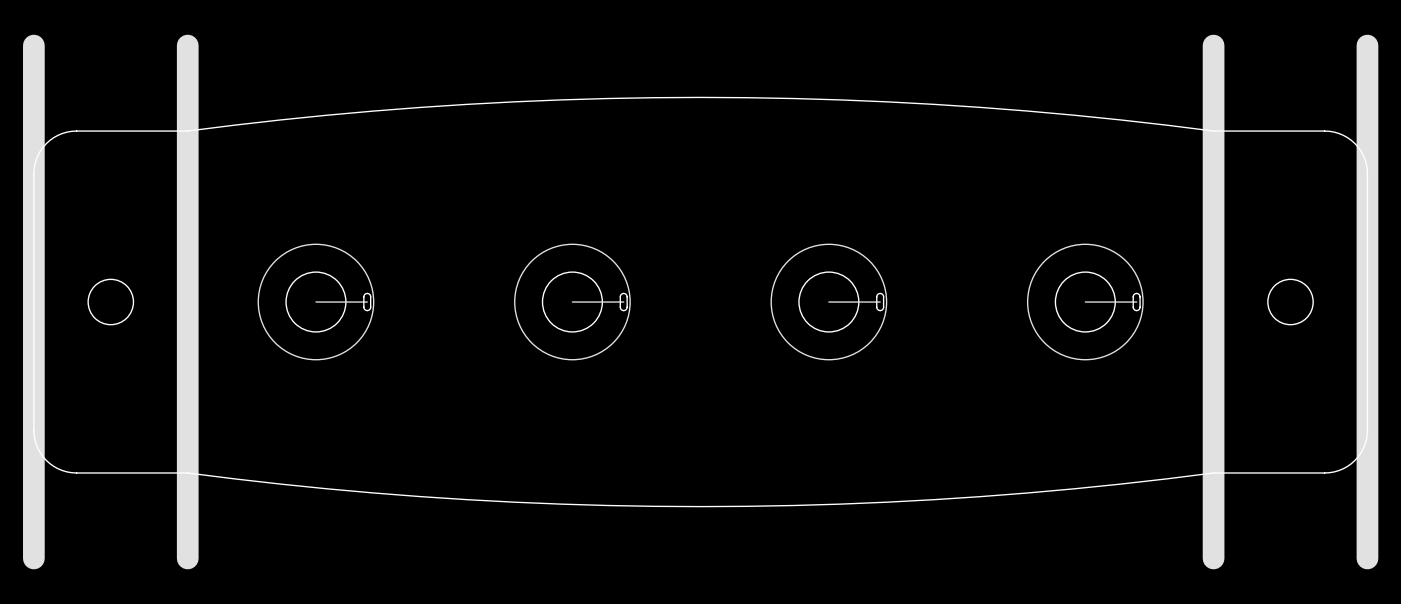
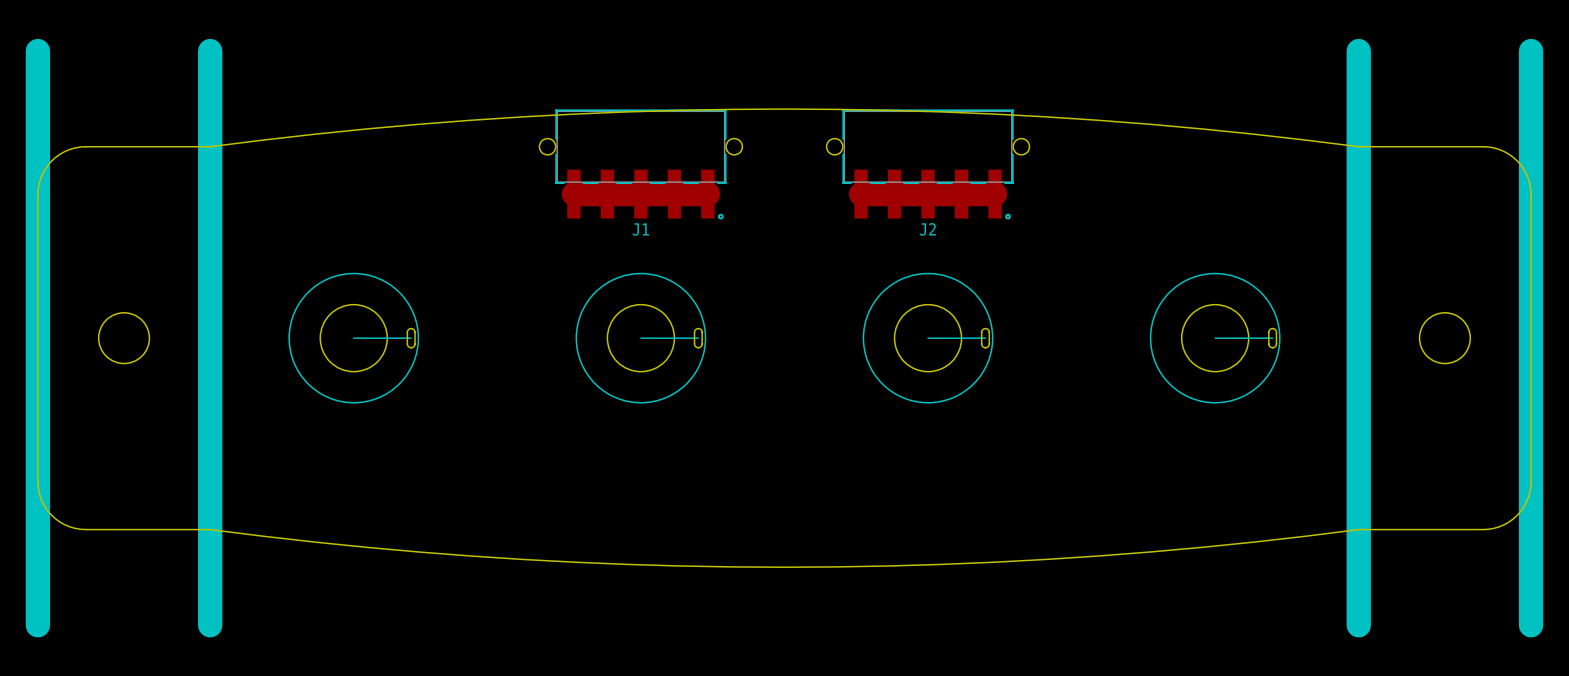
J1: none -> (640, 164)
J2: none -> (928, 164)
top track: none -> (573, 194) (707, 194)
top track: none -> (861, 194) (995, 194)

